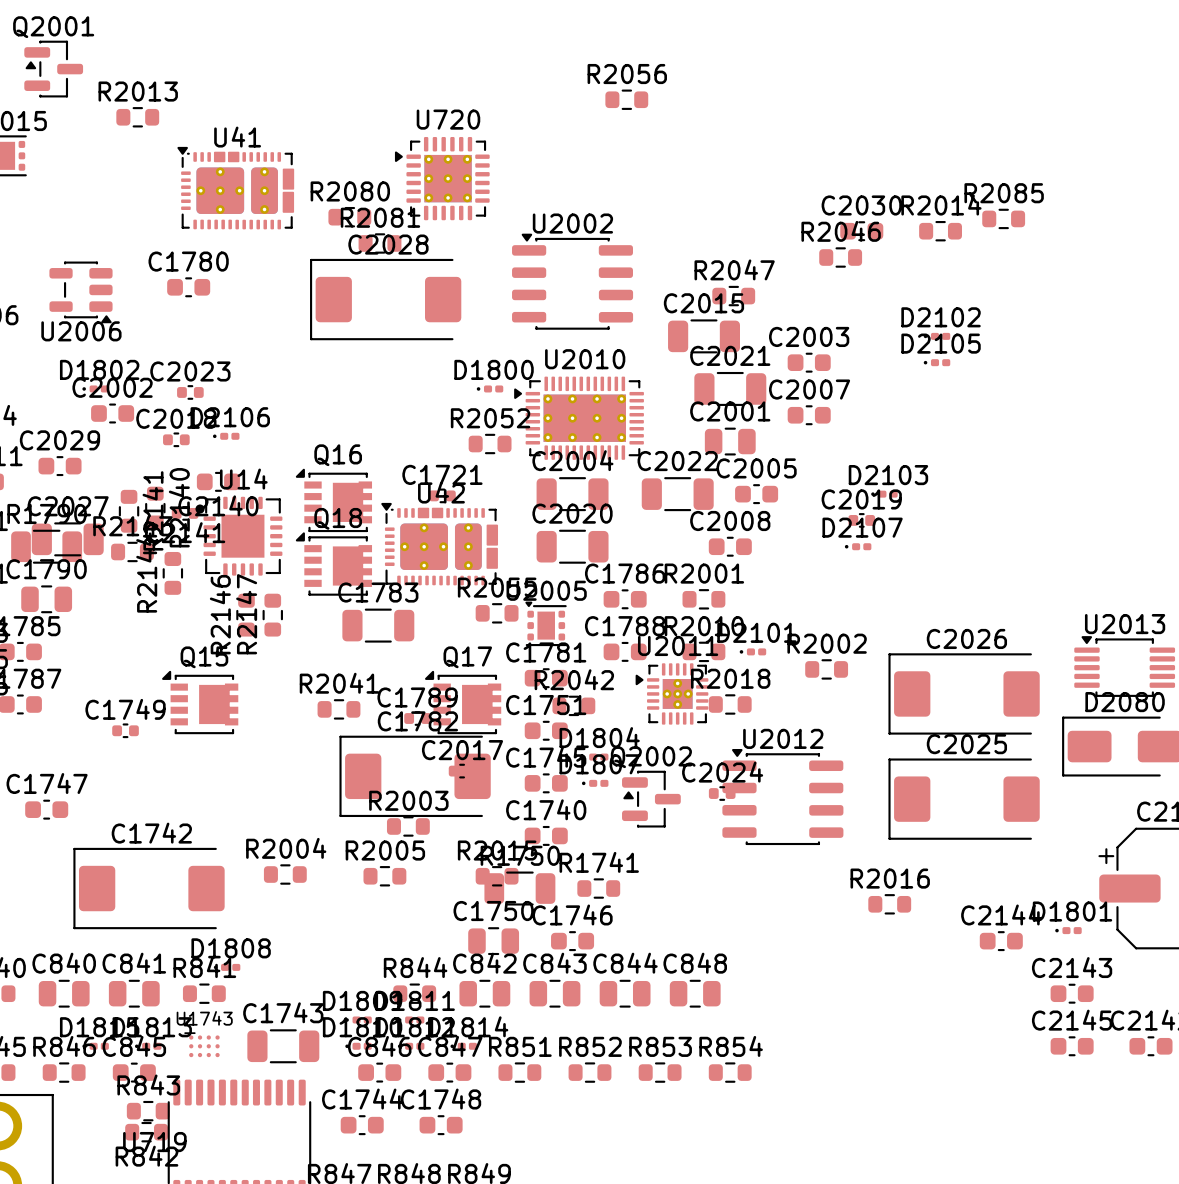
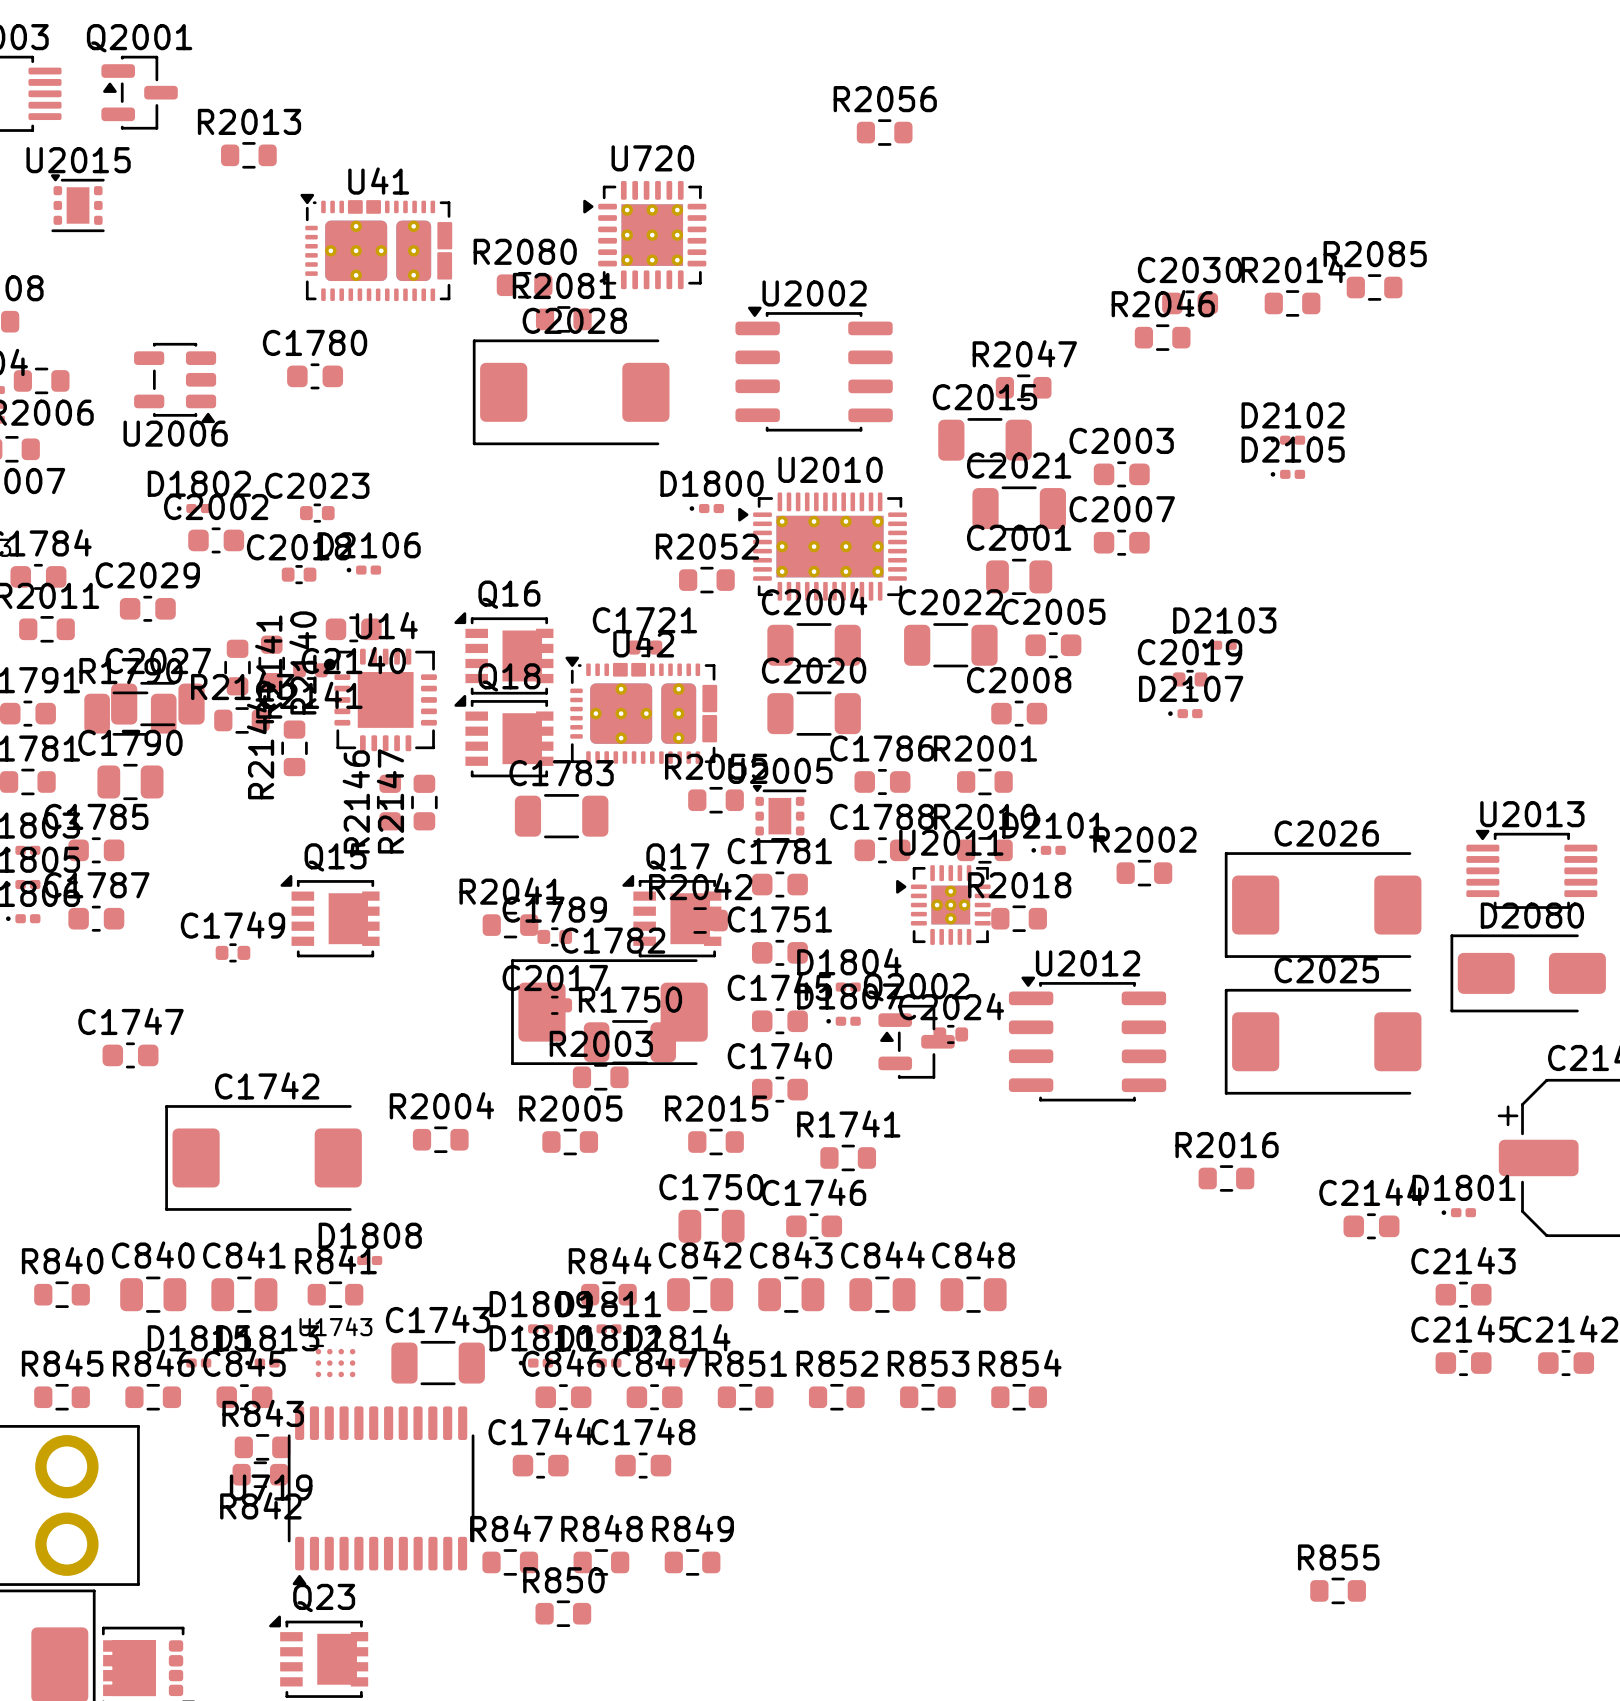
R2042 position: (573, 705) -> (700, 920)
C1789 position: (417, 718) -> (554, 936)
C2017 position: (462, 771) -> (554, 1005)
C2024 position: (722, 793) -> (950, 1034)
R1750 position: (519, 888) -> (629, 1042)

